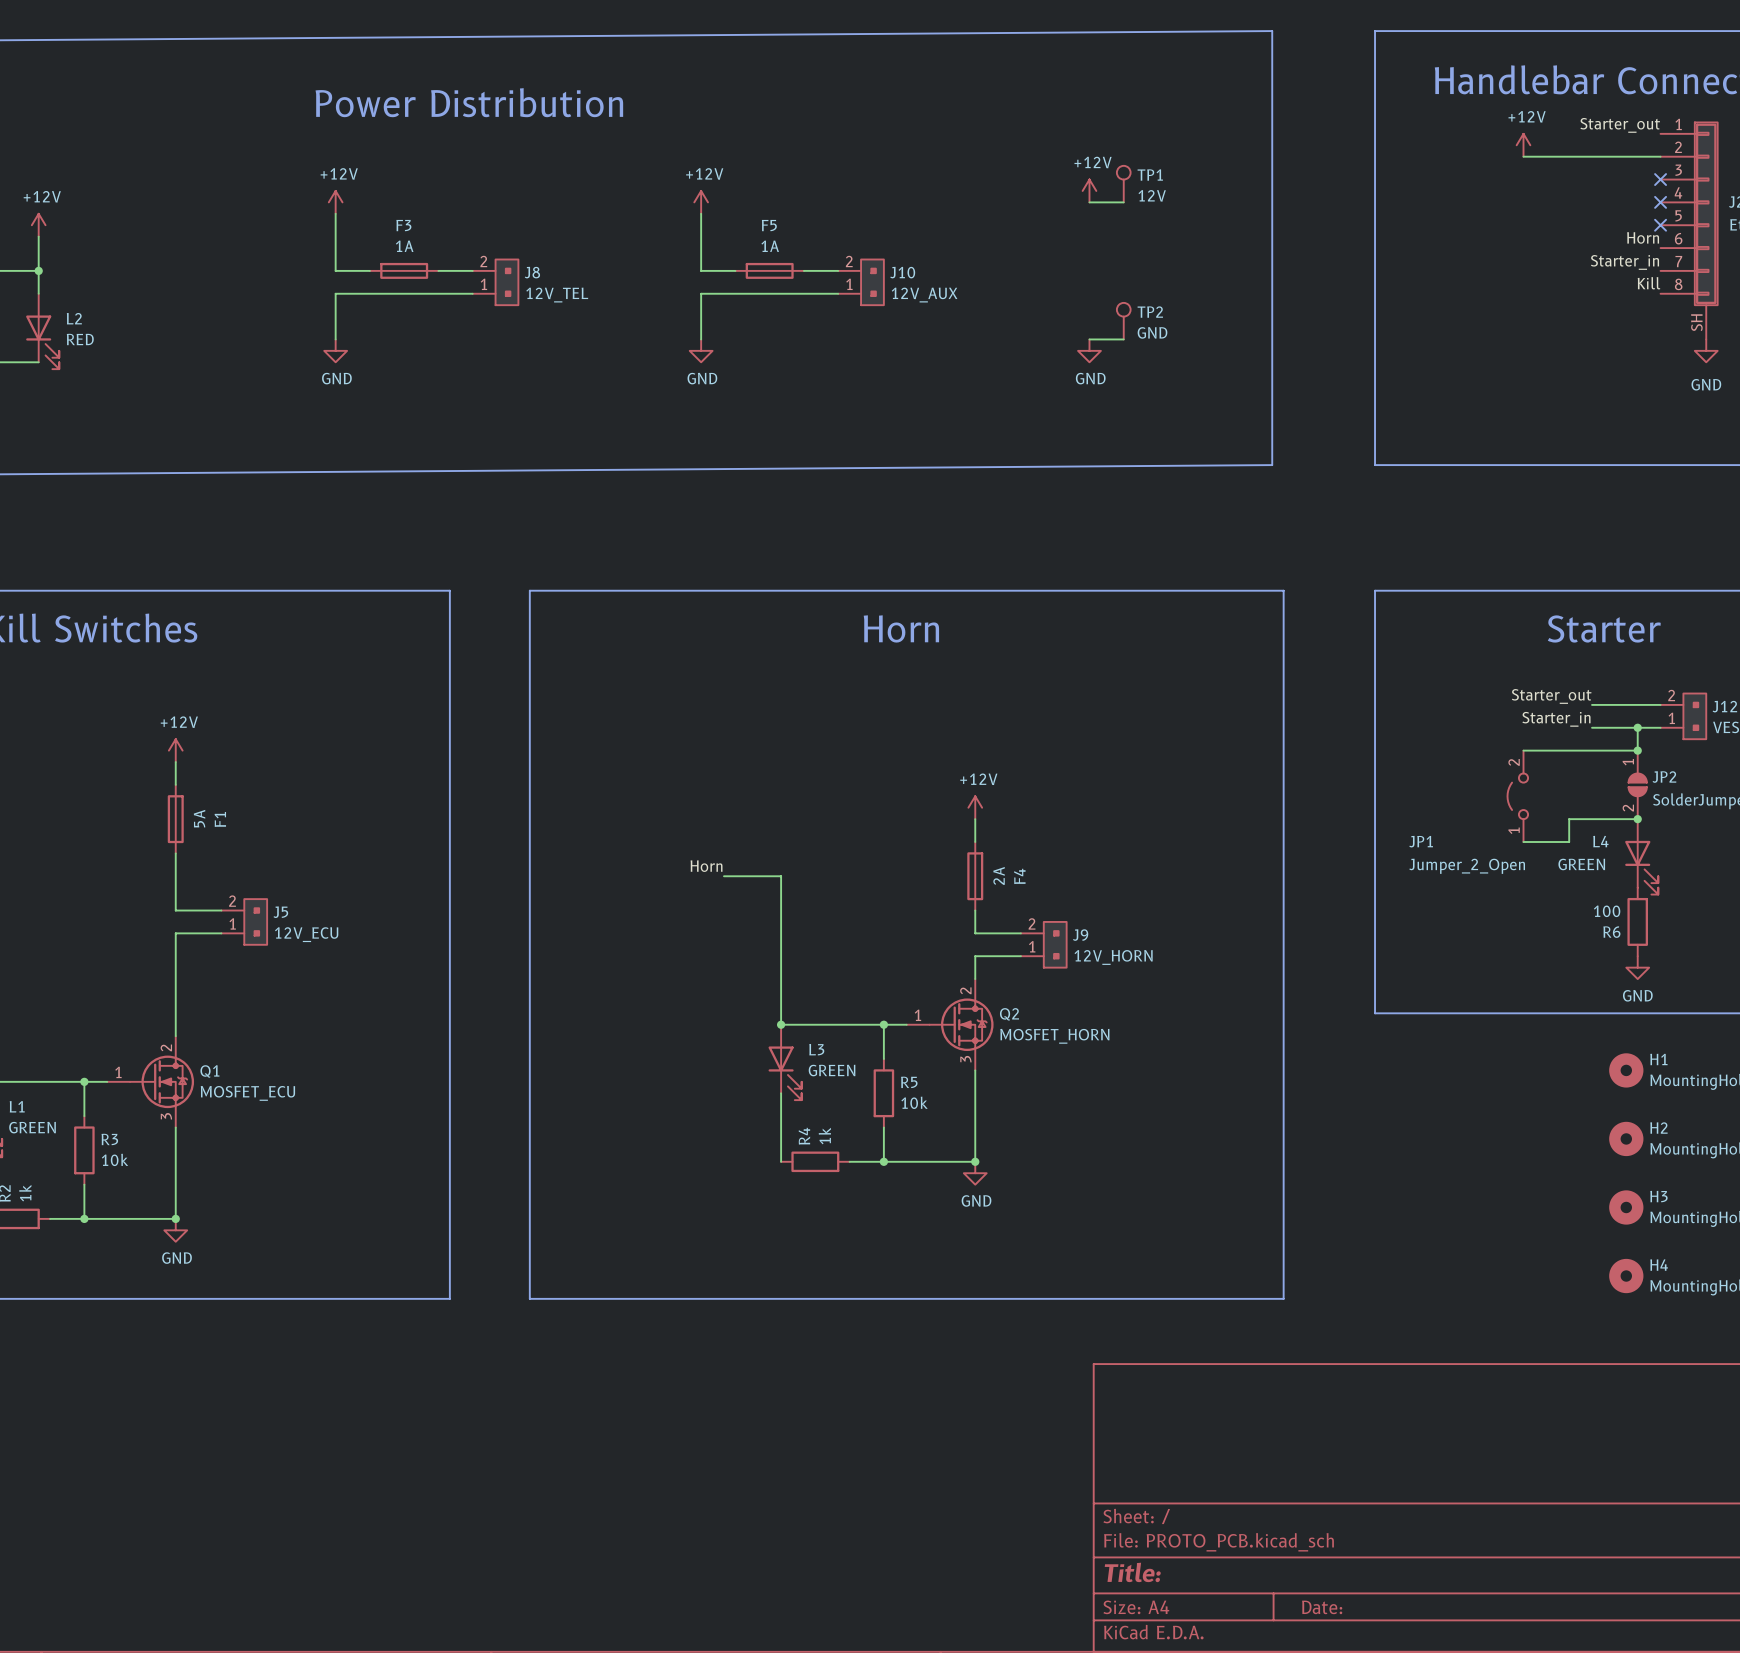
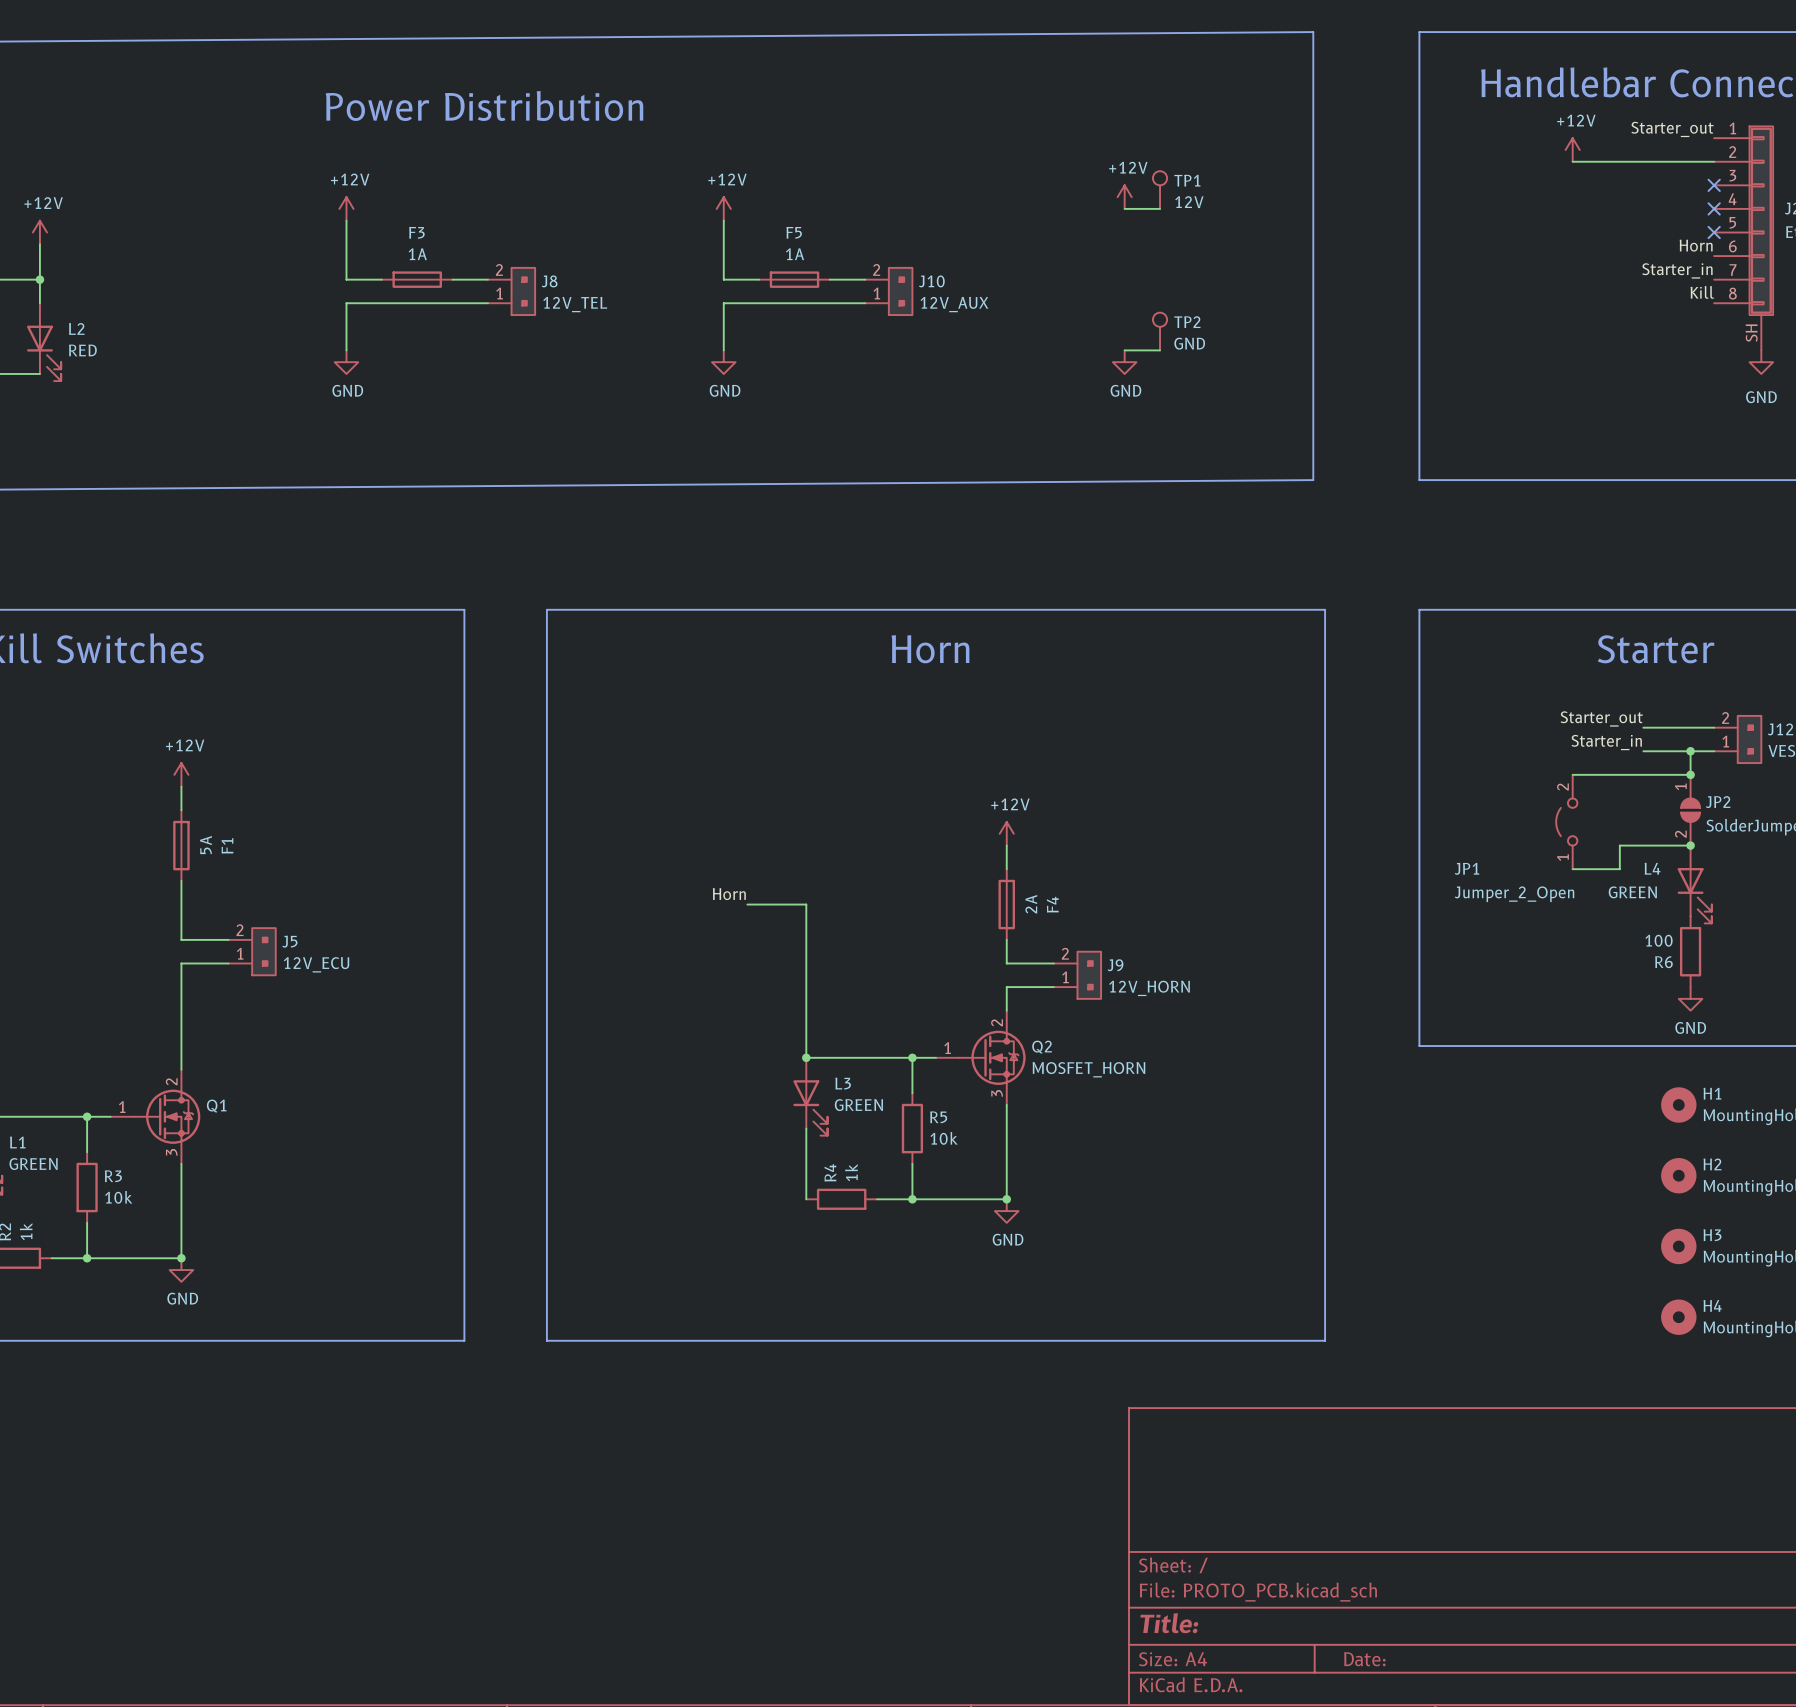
Q1 value: MOSFET_ECU (247, 1093) -> none

